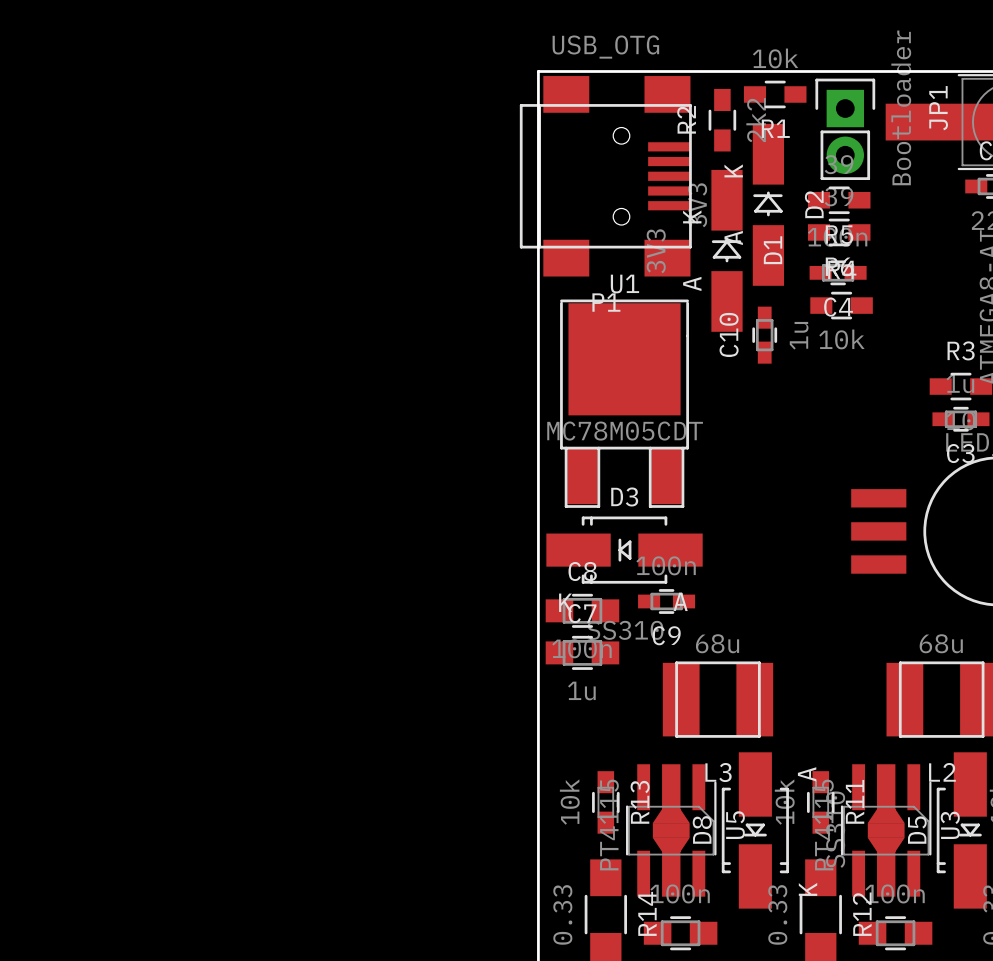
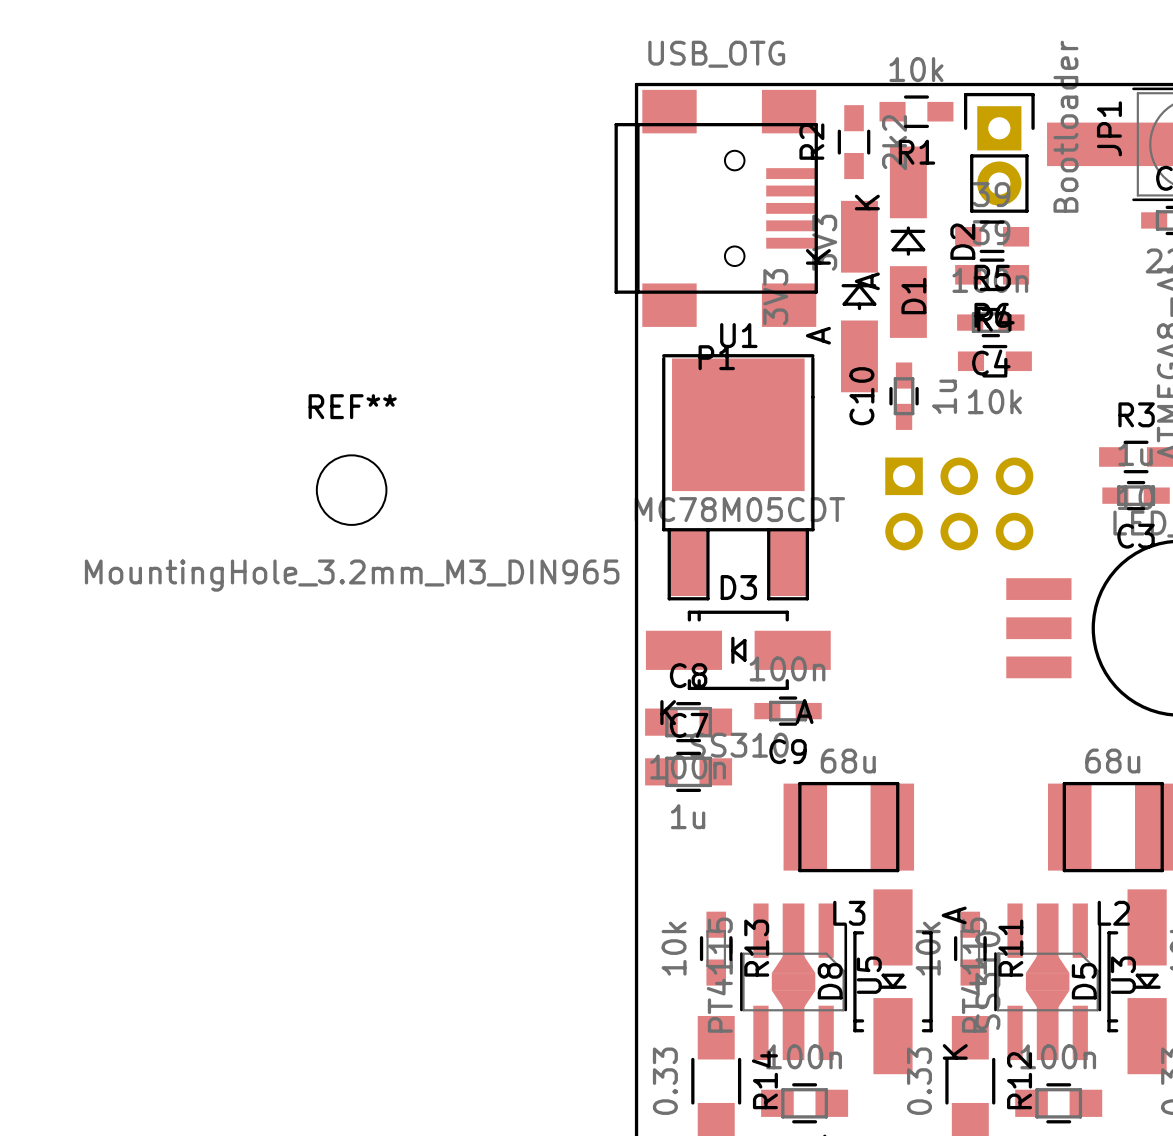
REF**: none -> MountingHole_3.2mm_M3_DIN965 (351, 490)
part: none -> (959, 503)

